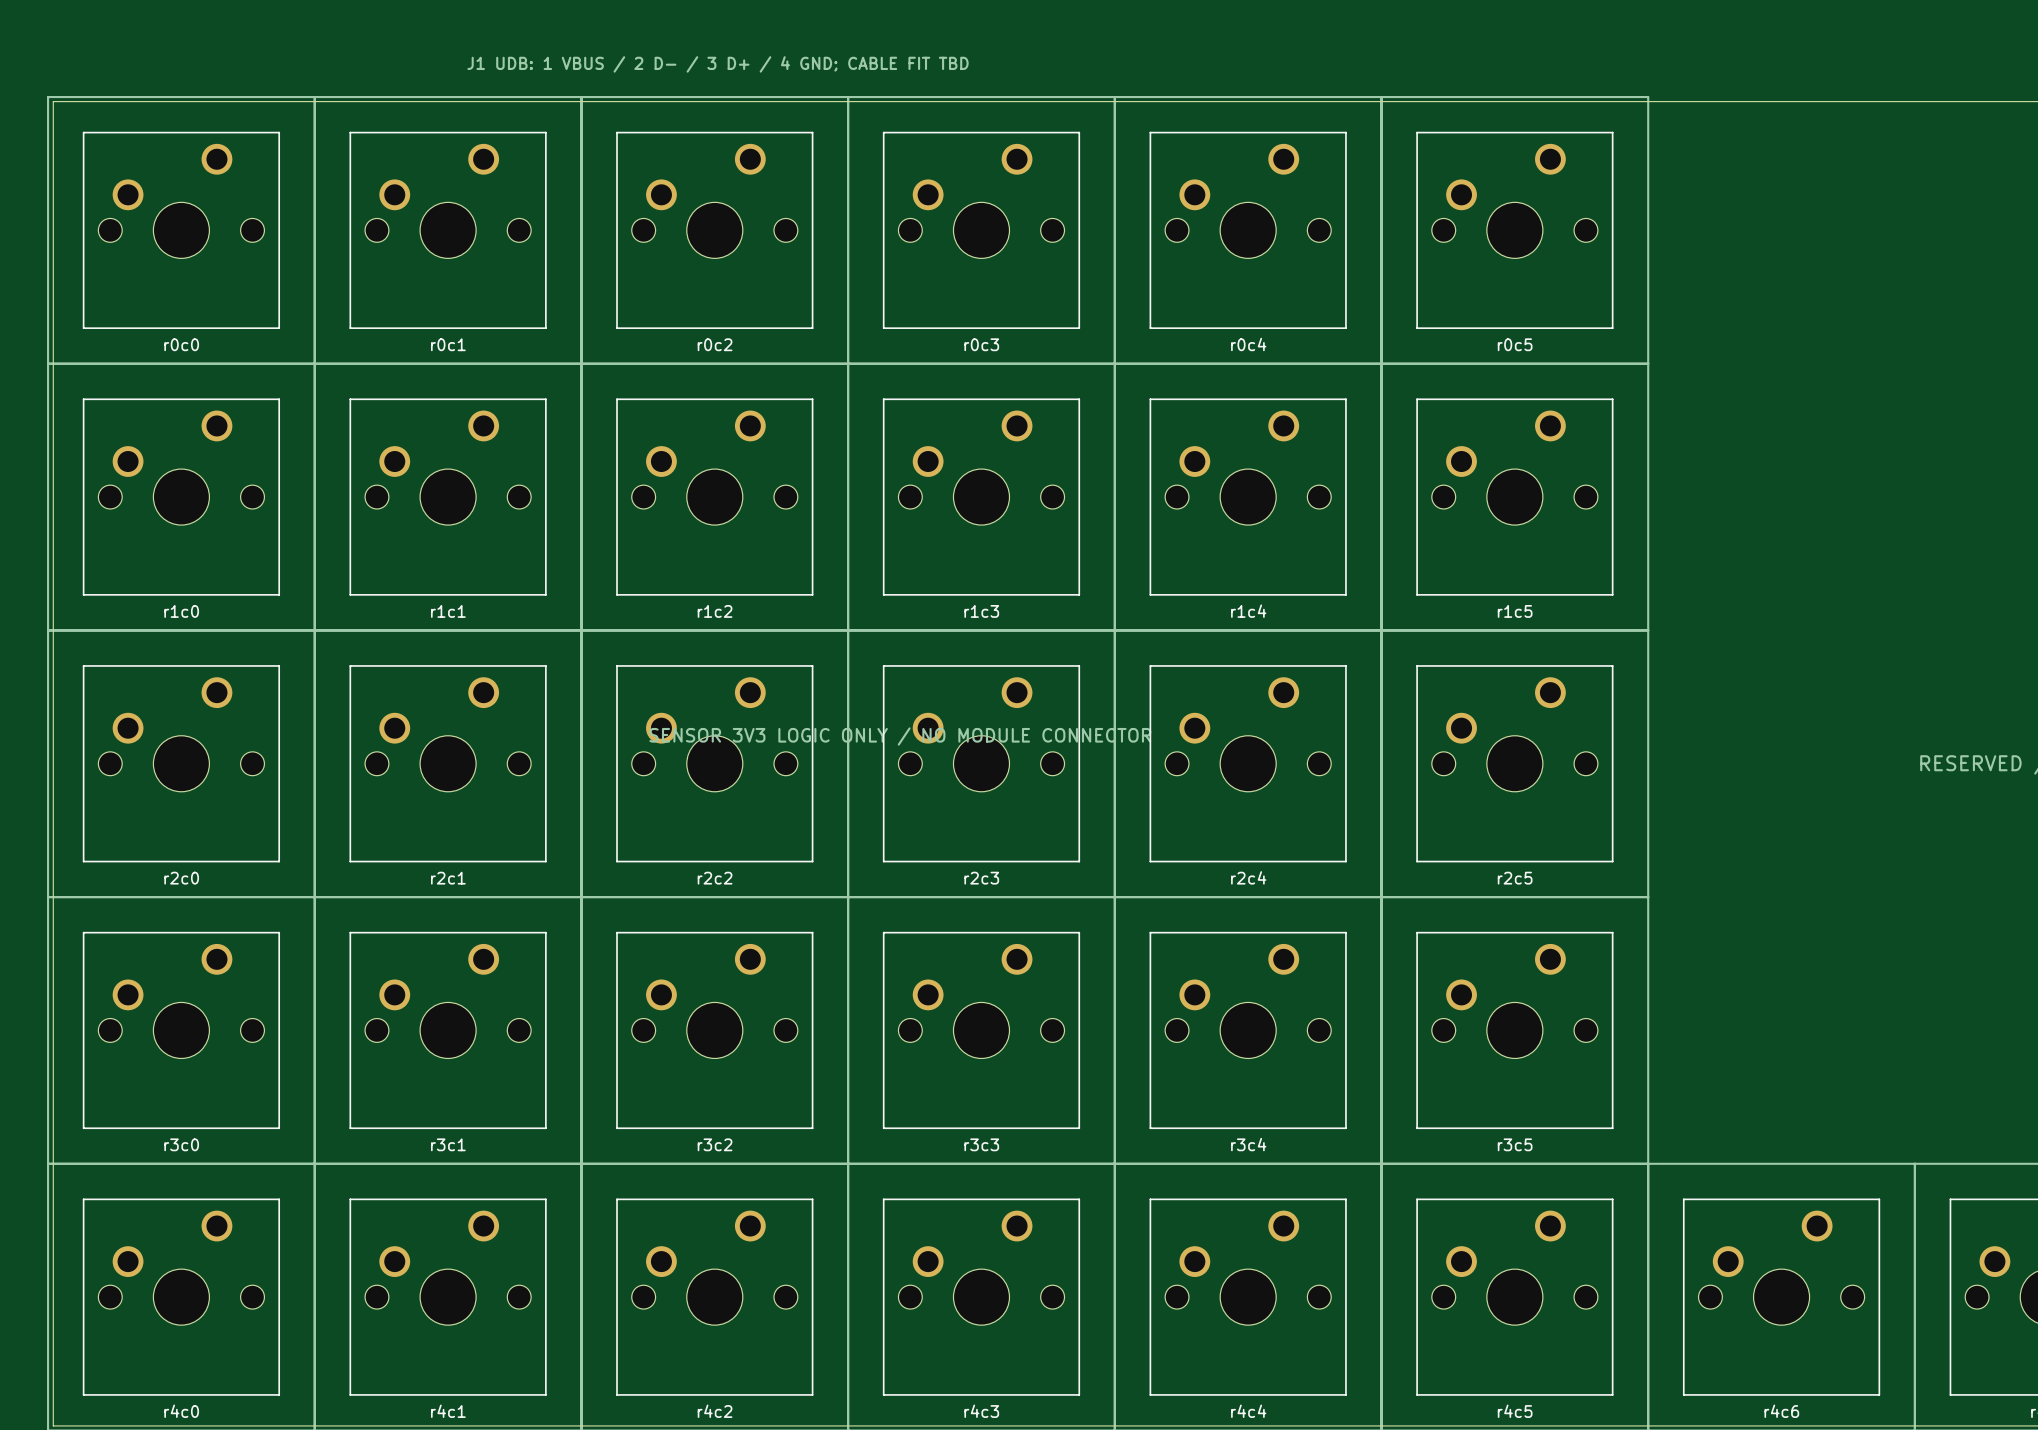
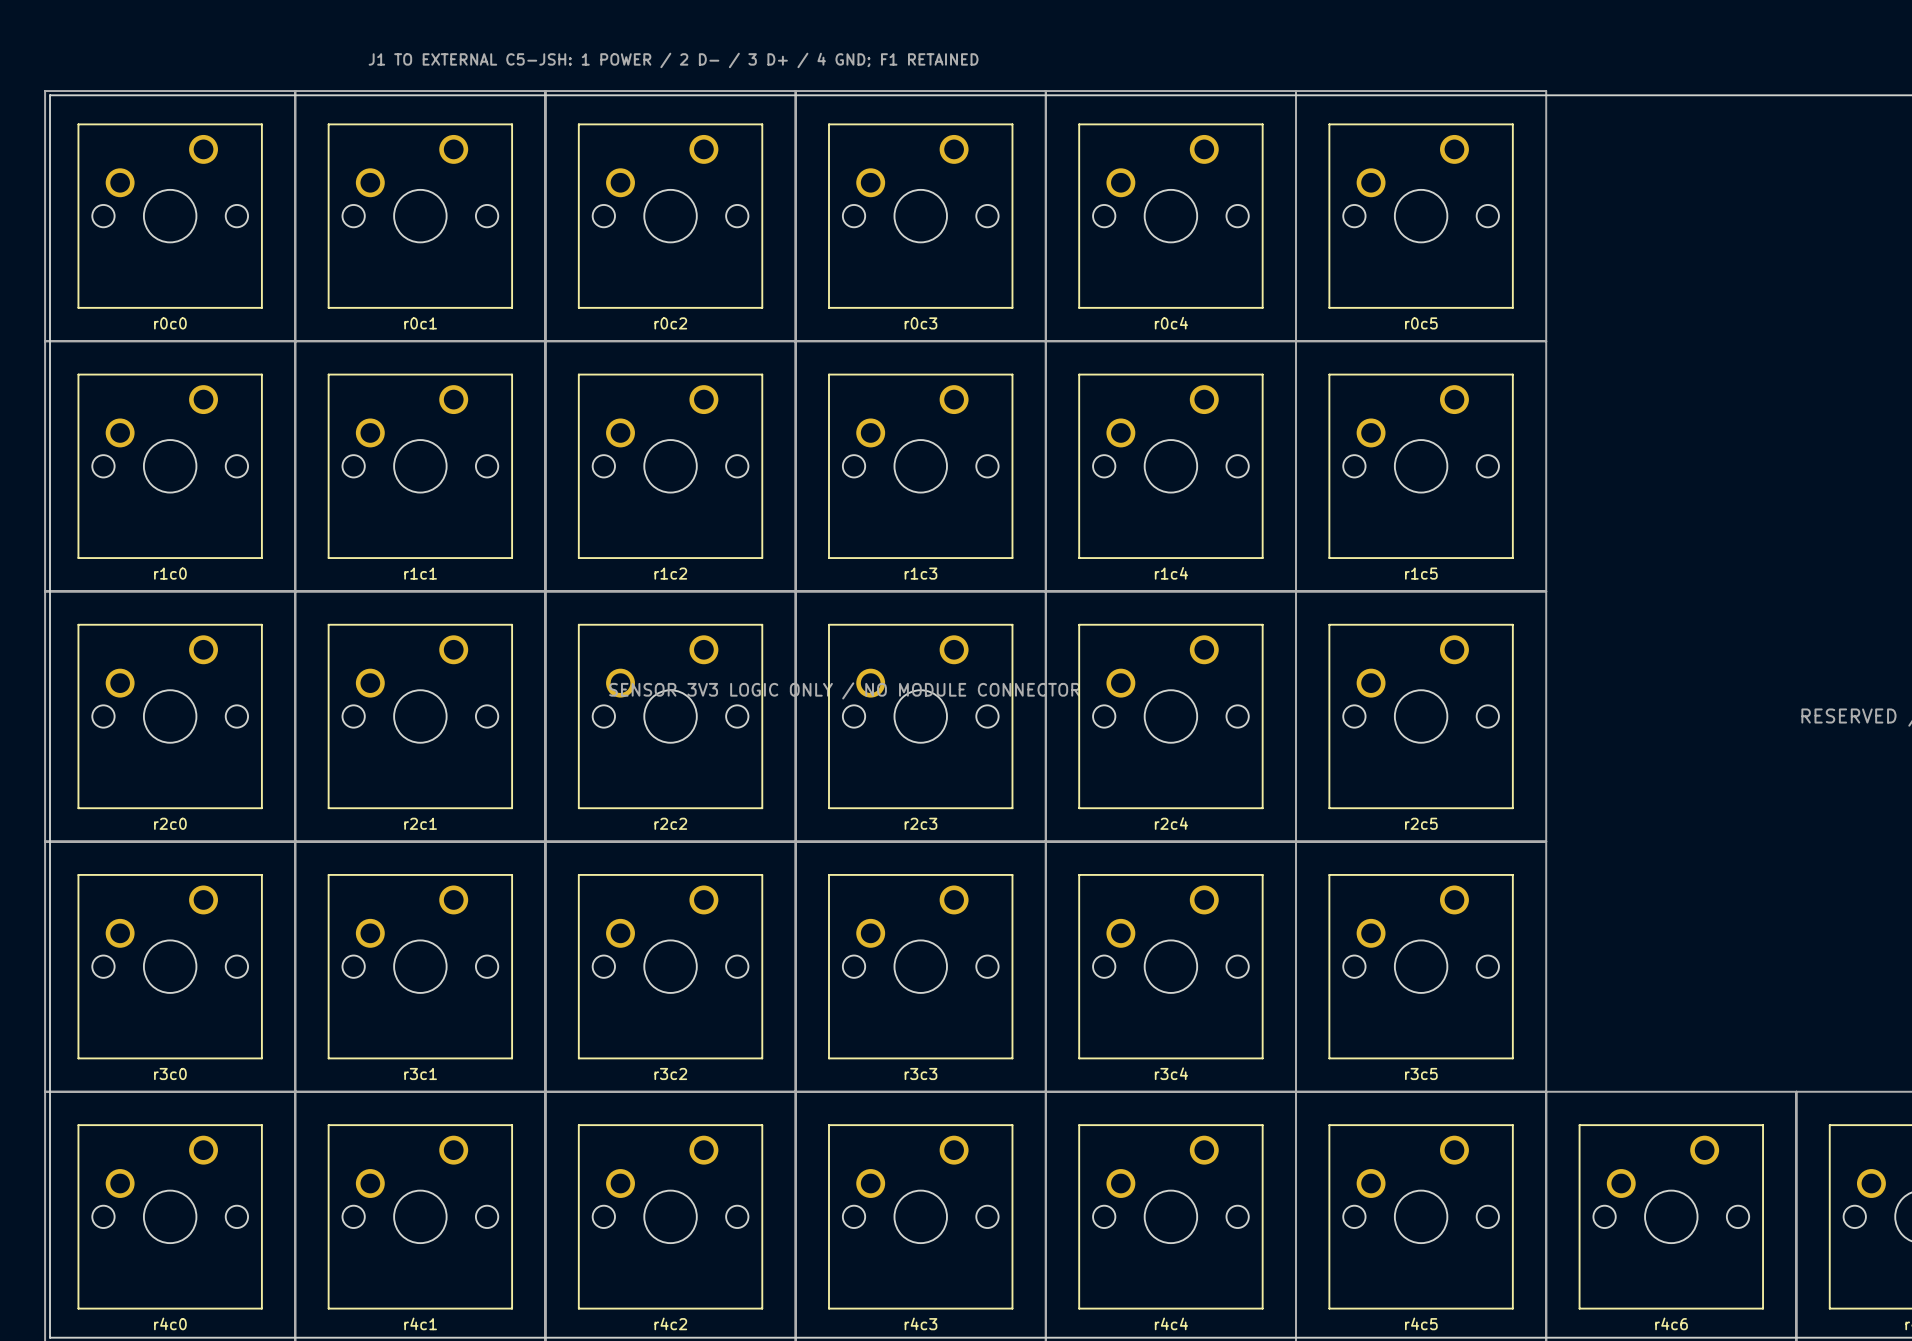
text: J1 UDB: 1 VBUS / 2 D- / 3 D+ / 4 GND; CABLE FIT TBD (718, 64) -> J1 TO EXTERNAL C5-JSH: 1 POWER / 2 D- / 3 D+ / 4 GND; F1 RETAINED (673, 60)

